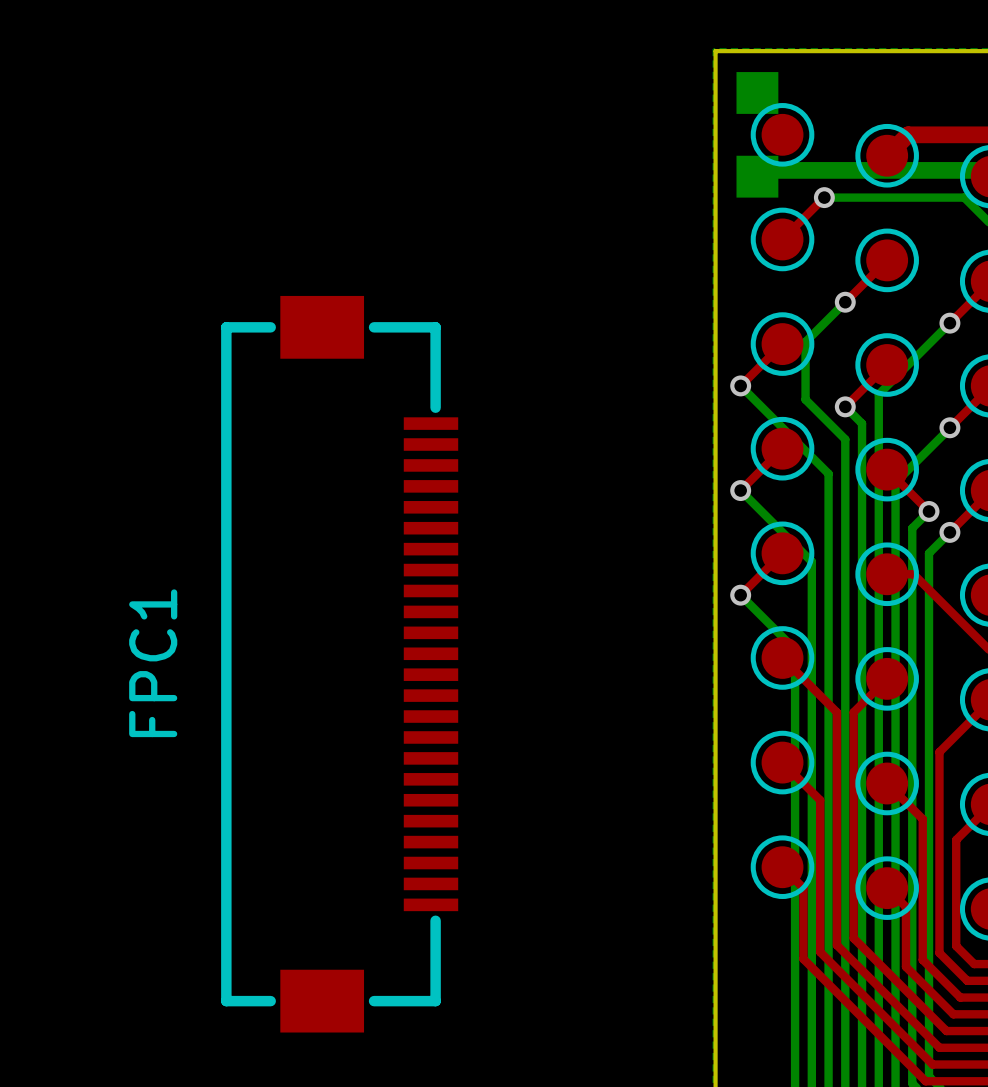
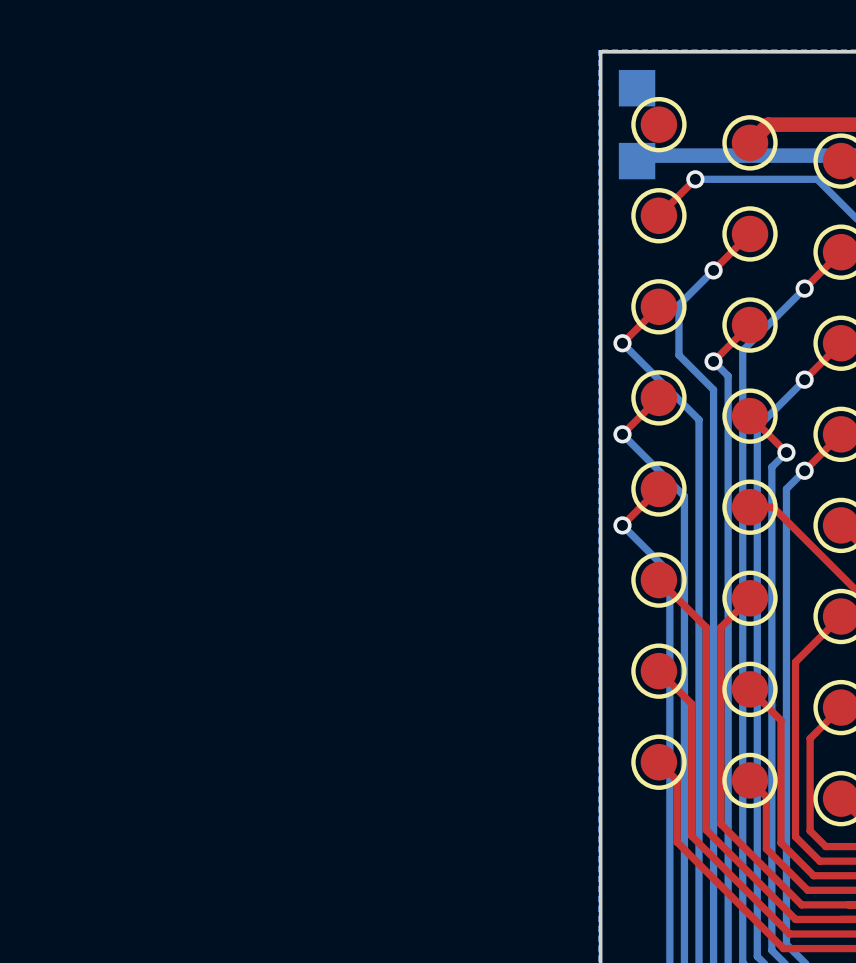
FPC1: (339, 664) -> none

